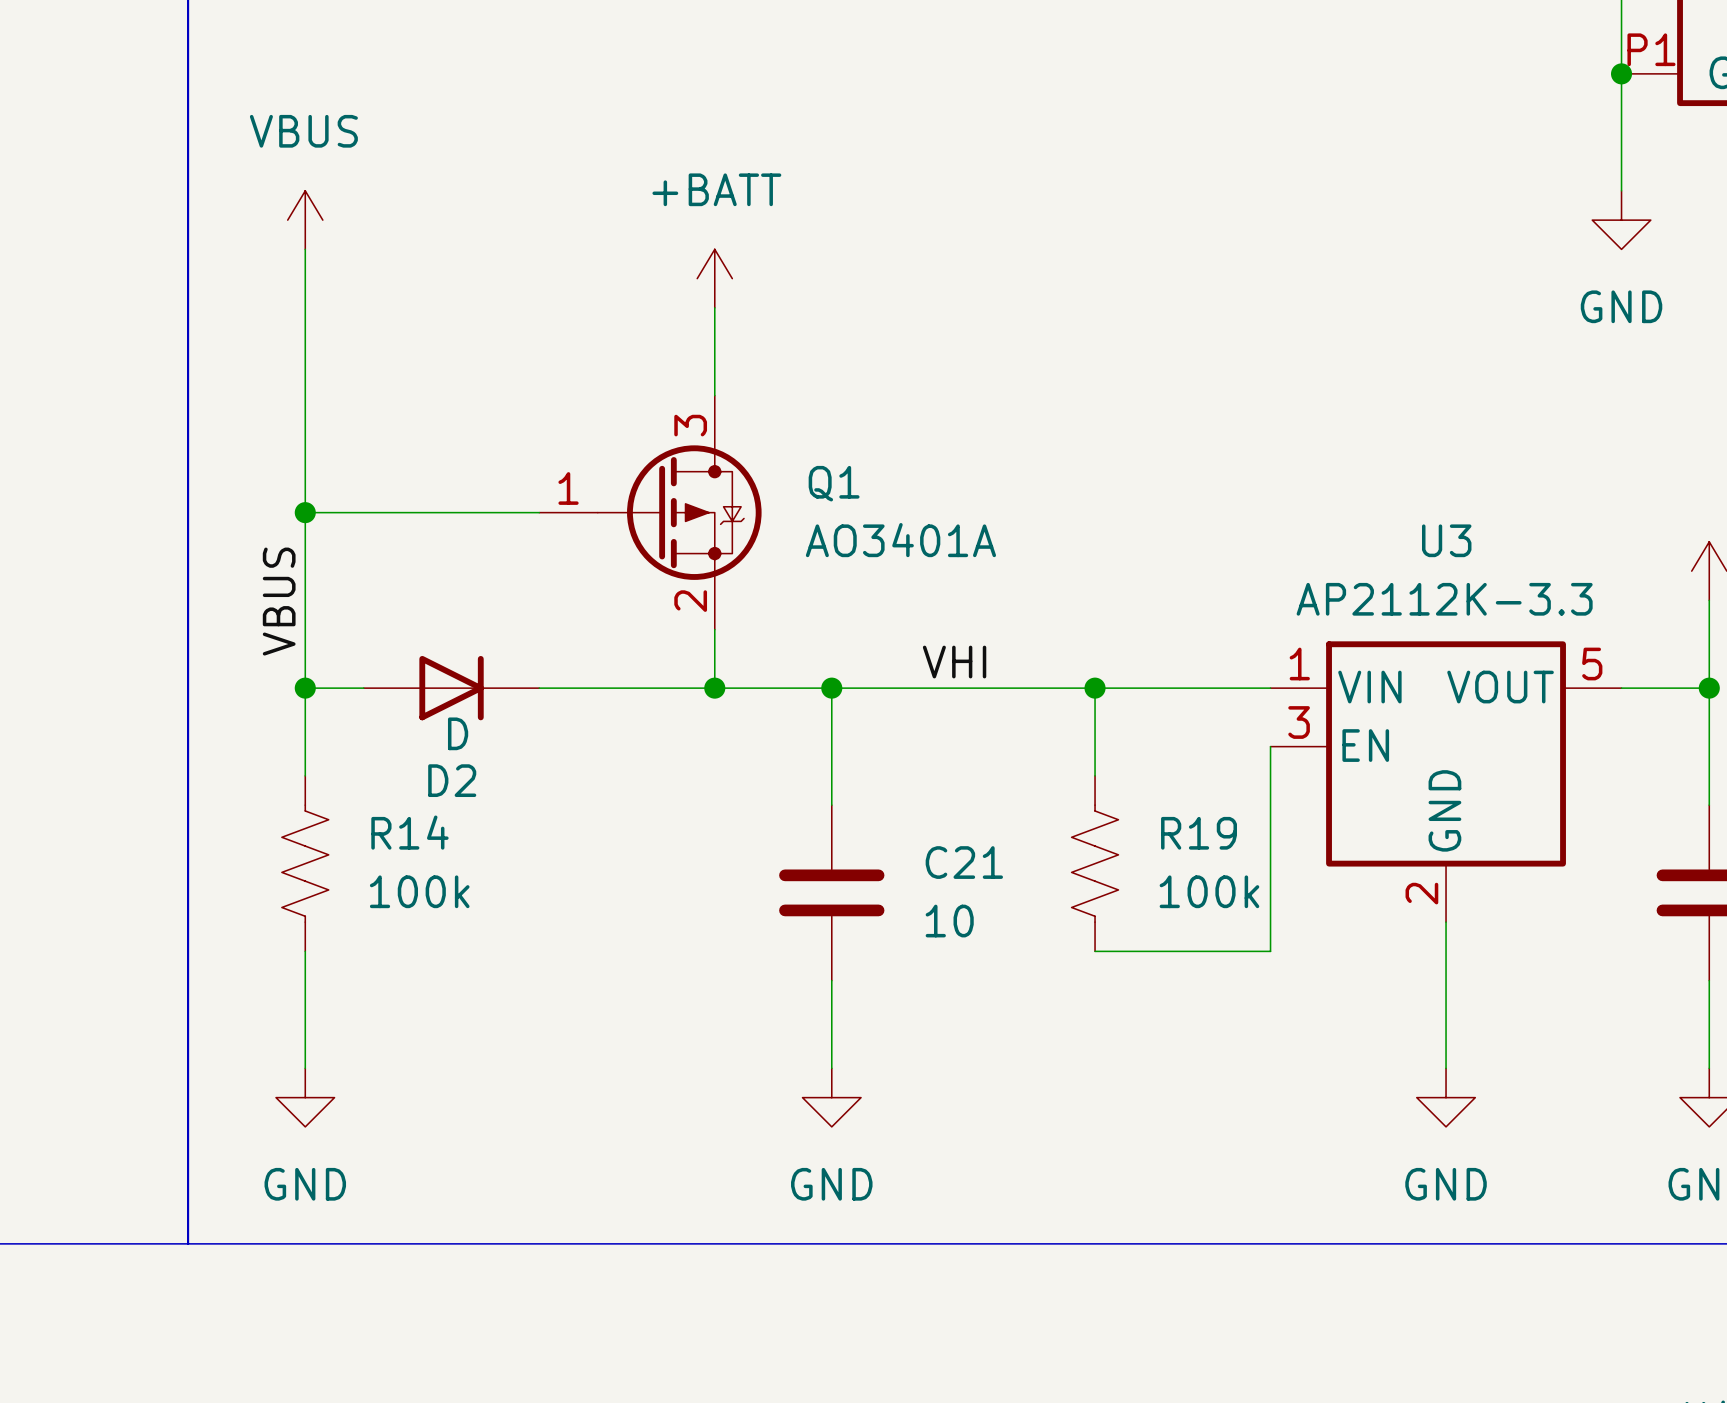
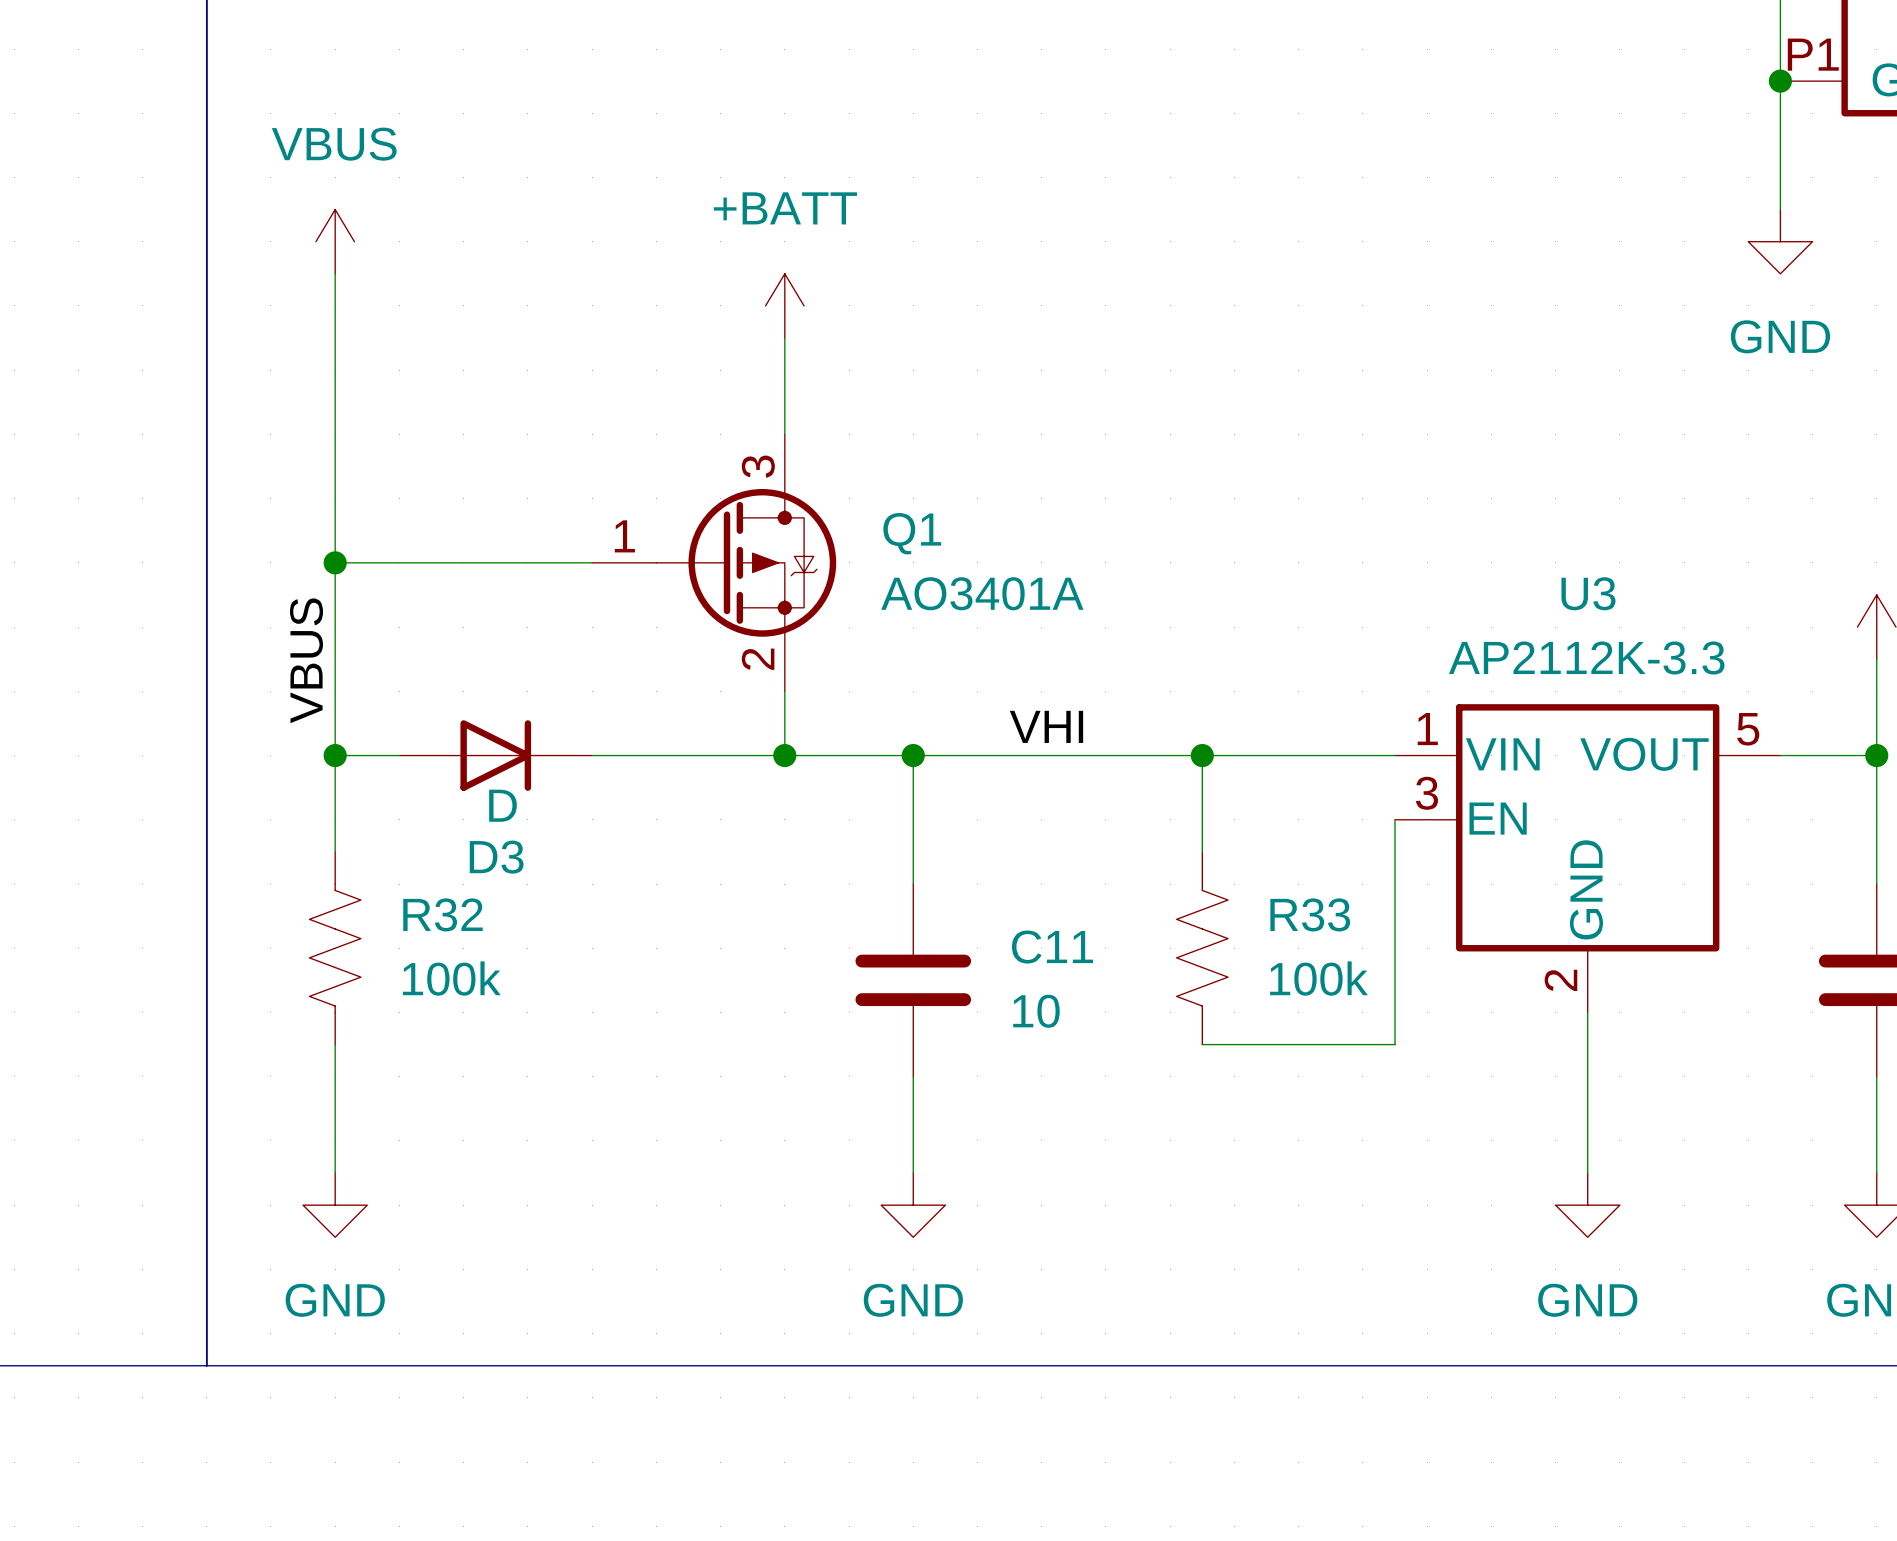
D2 name: D2 (452, 780) -> D3 (496, 857)
R14 name: R14 (409, 832) -> R32 (442, 914)
R19 name: R19 (1199, 833) -> R33 (1310, 914)
C21 name: C21 (964, 862) -> C11 (1052, 947)

